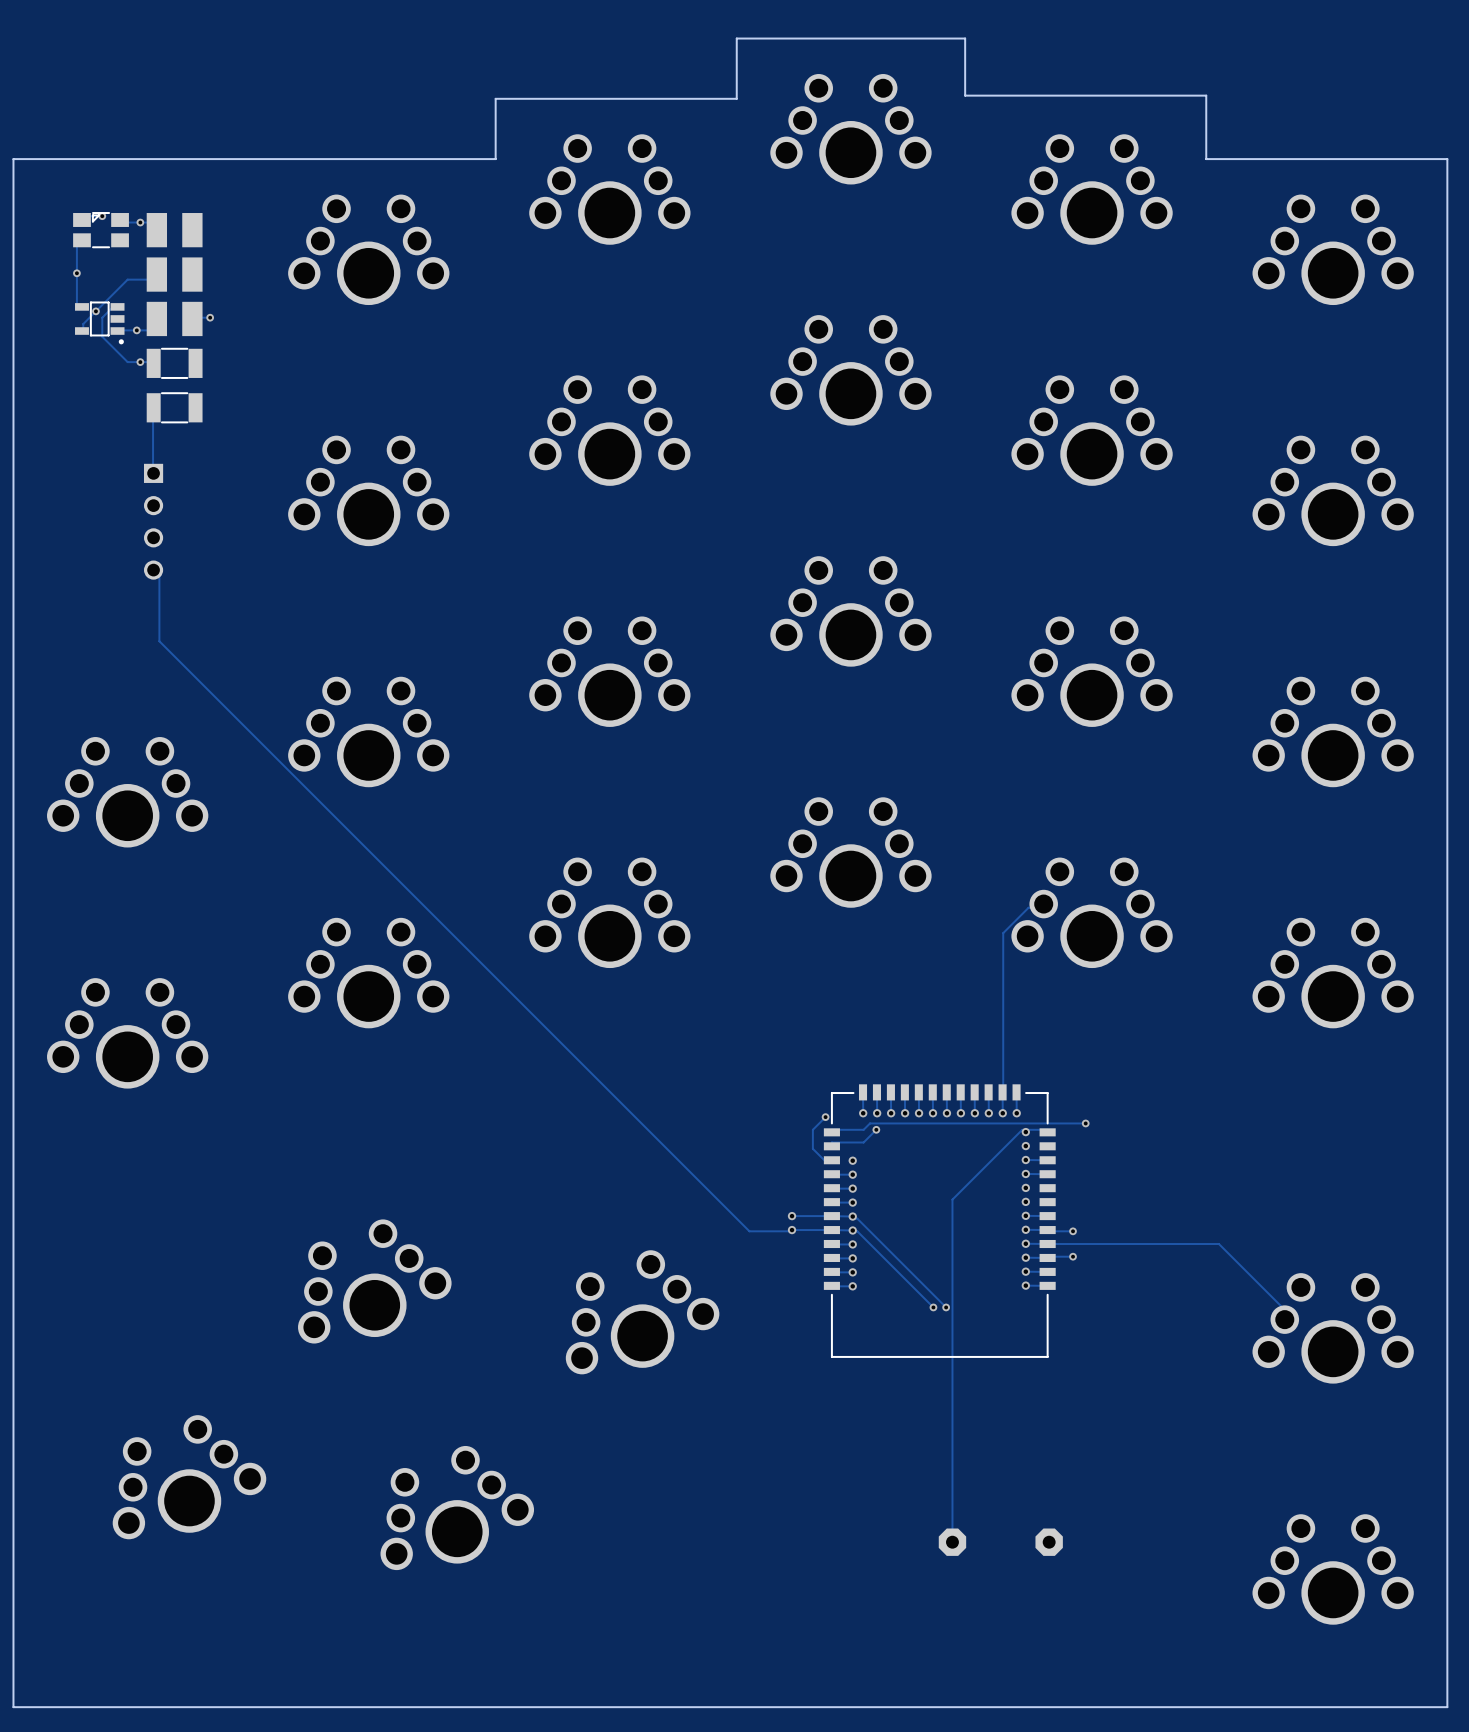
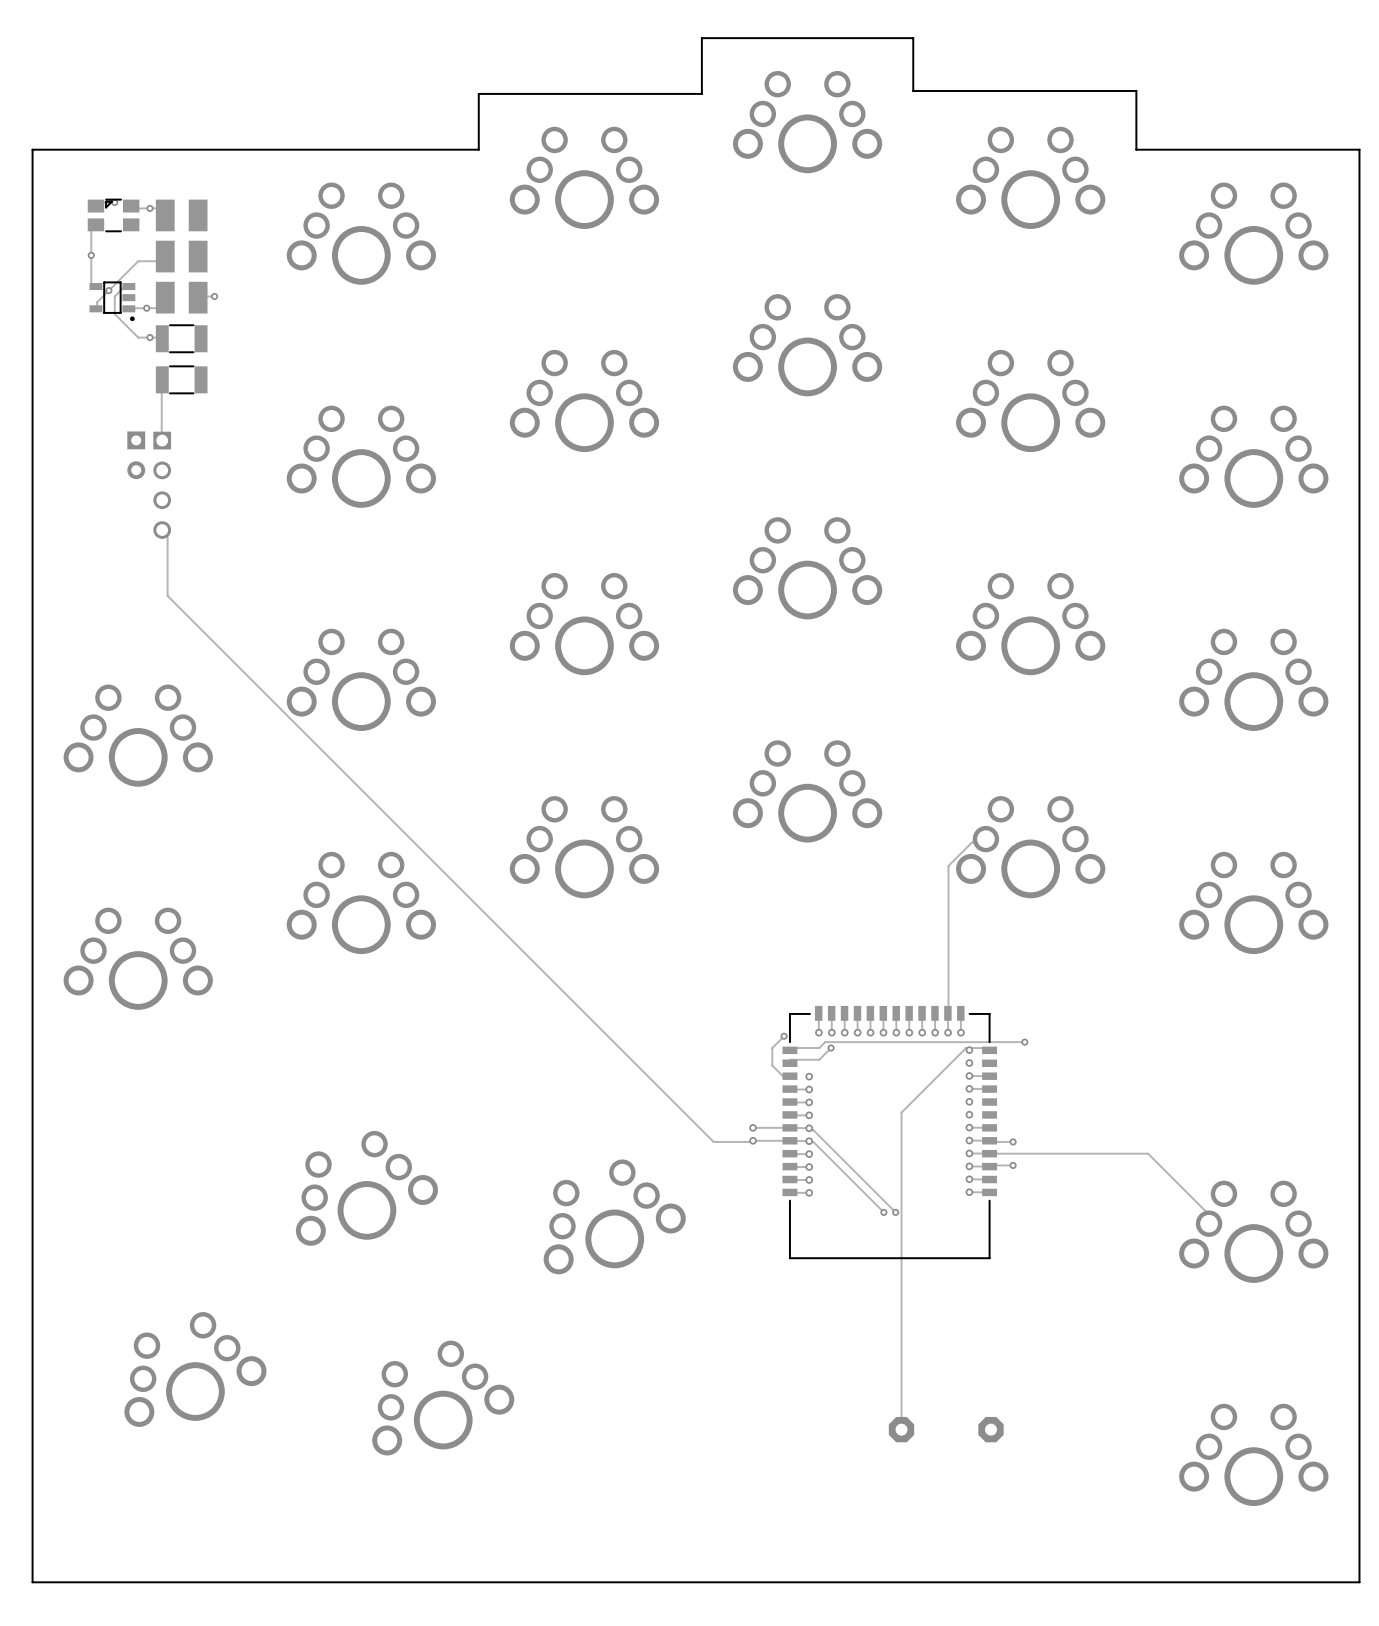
part: none -> (136, 455)

